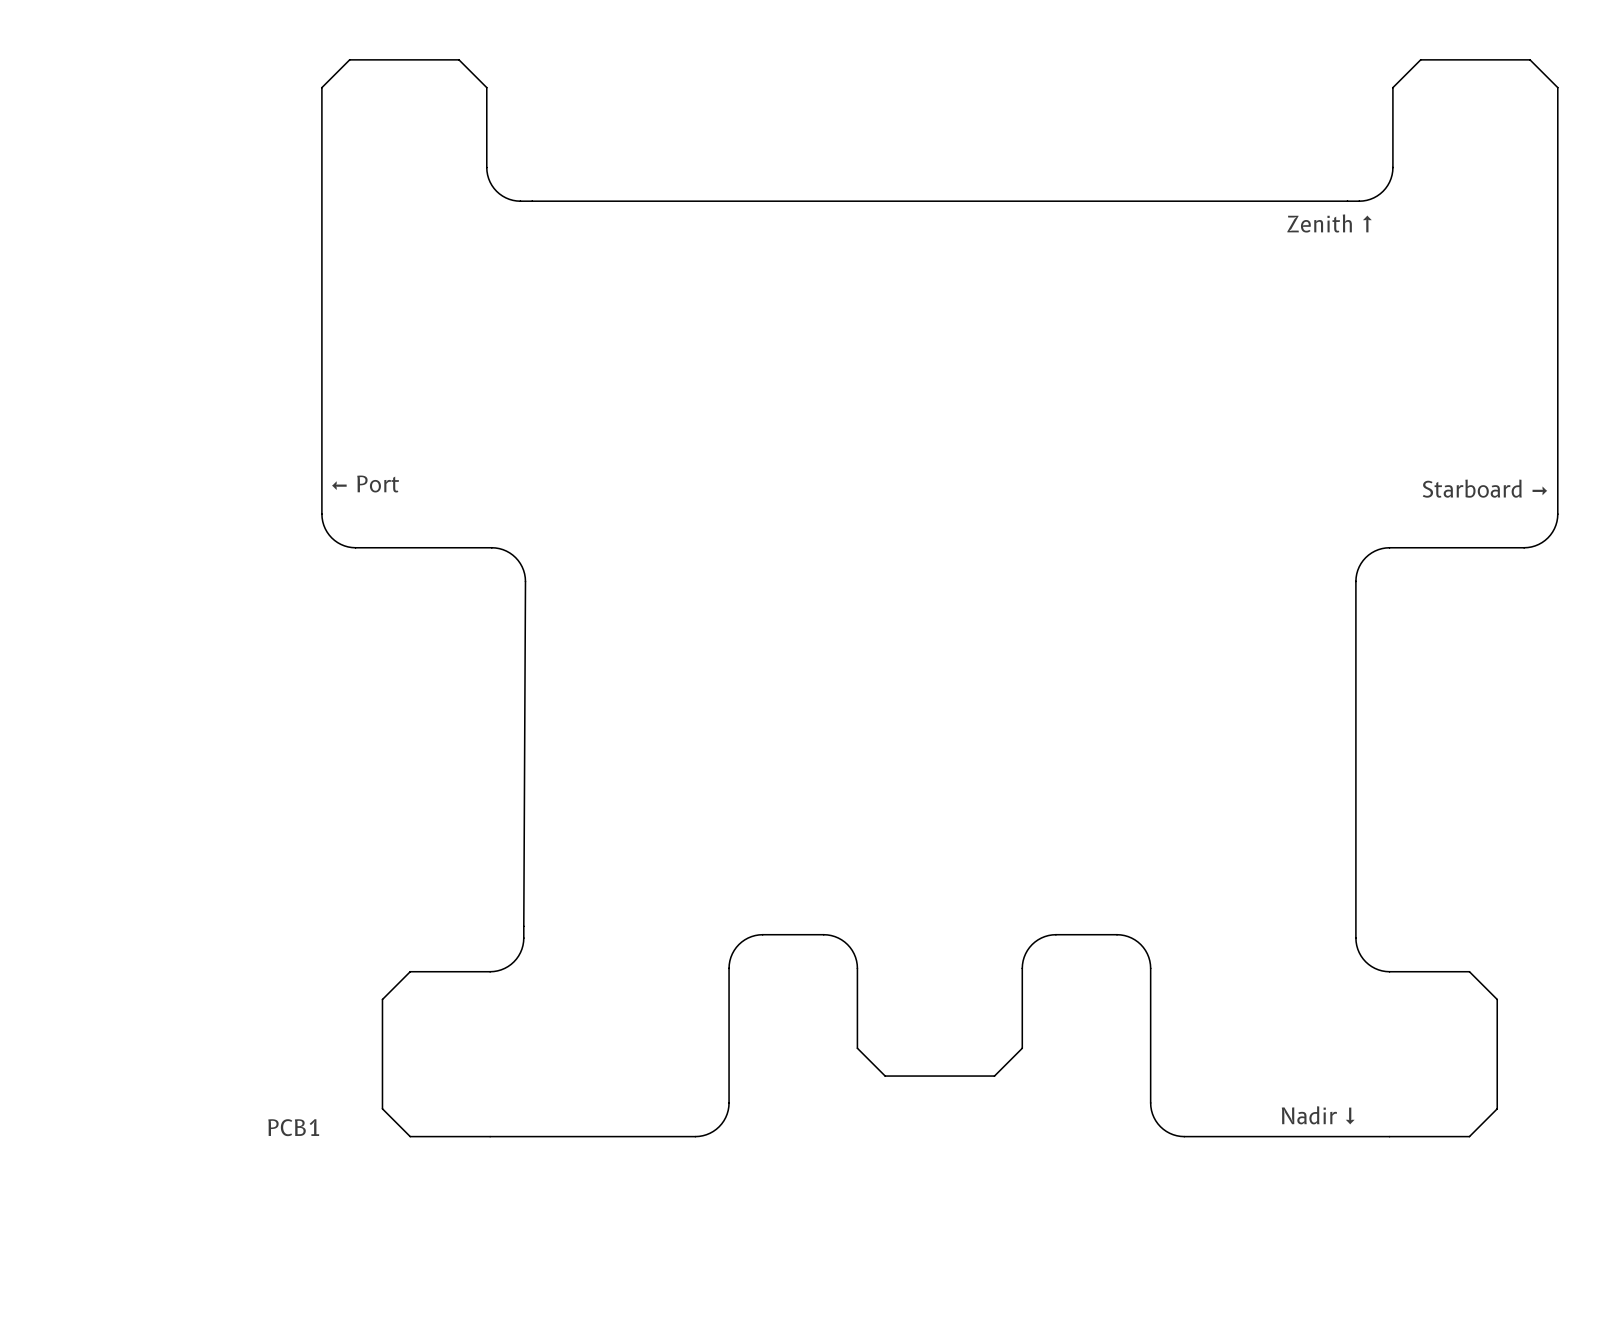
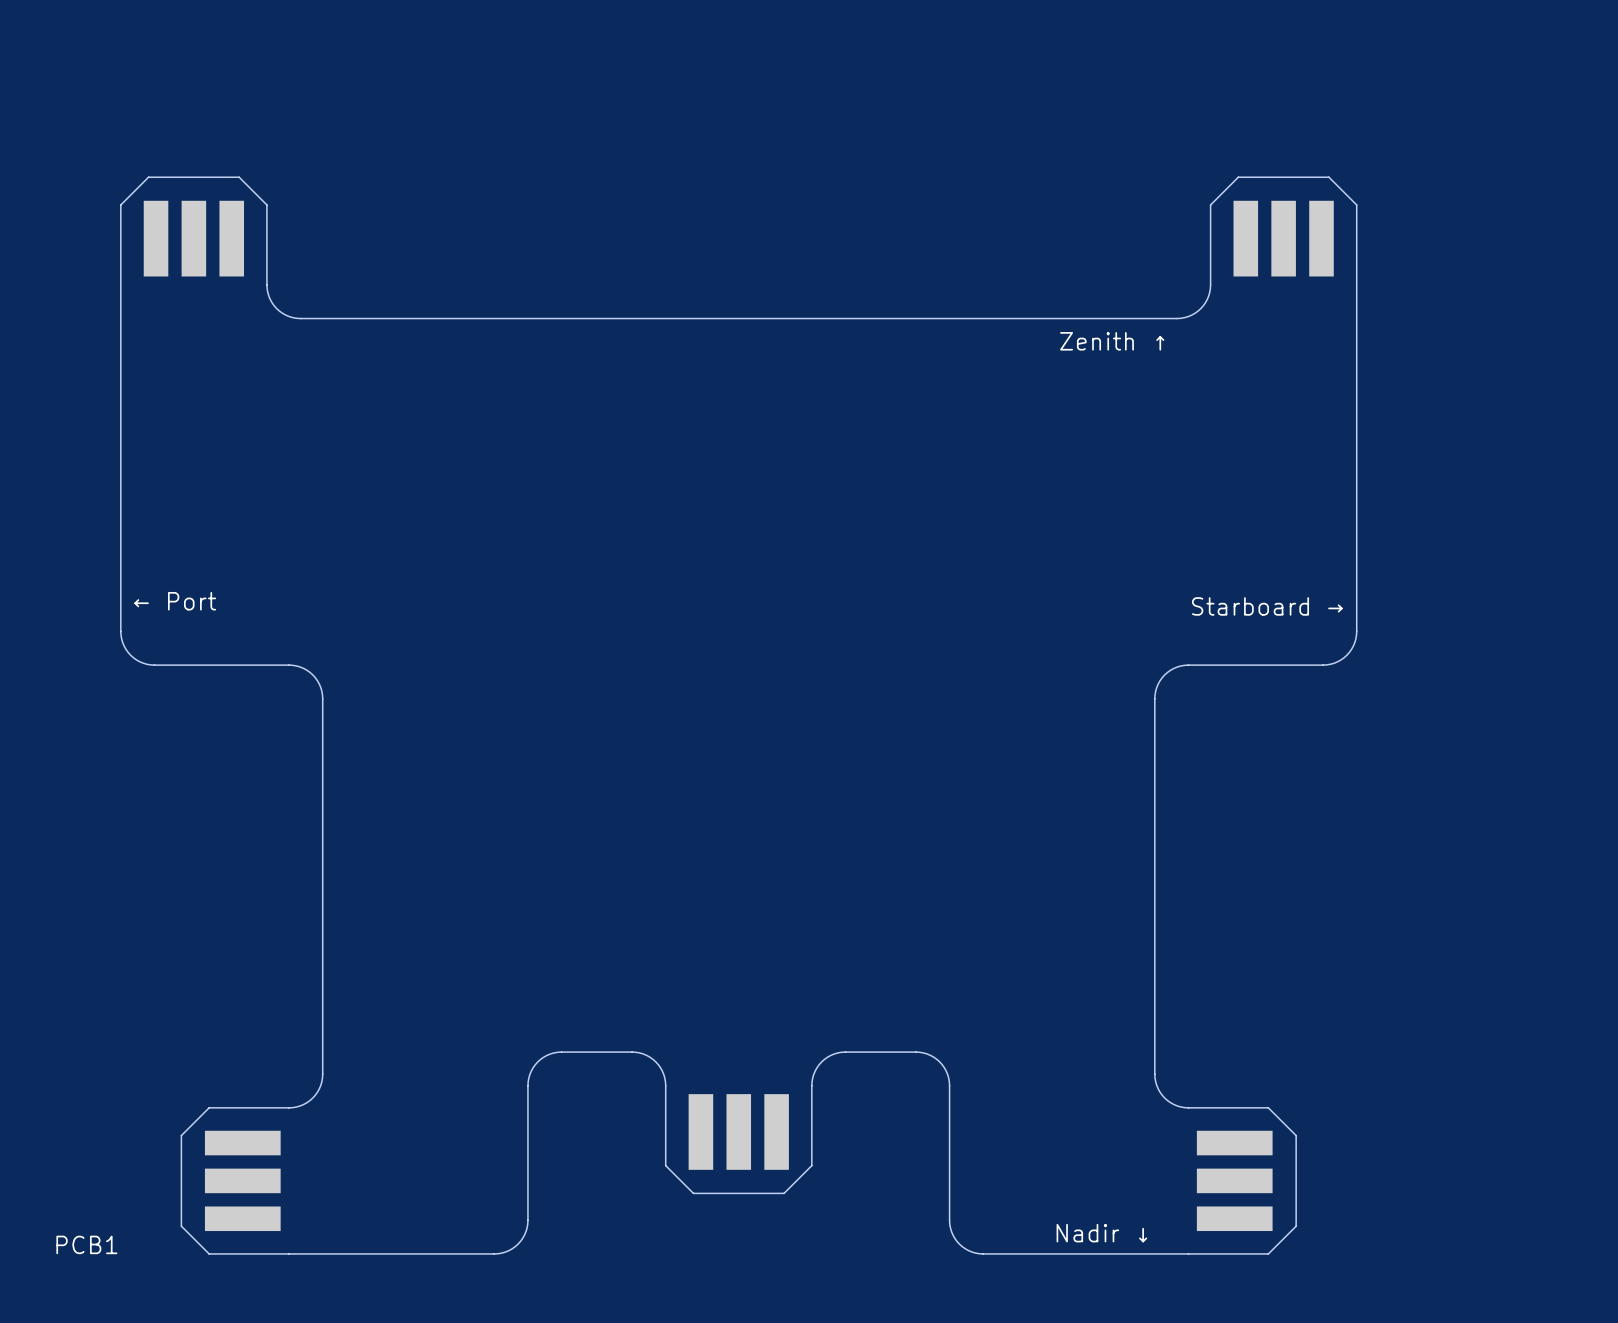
PCB1 footprint: [321, 59, 1559, 1138] -> [120, 176, 1358, 1255]

